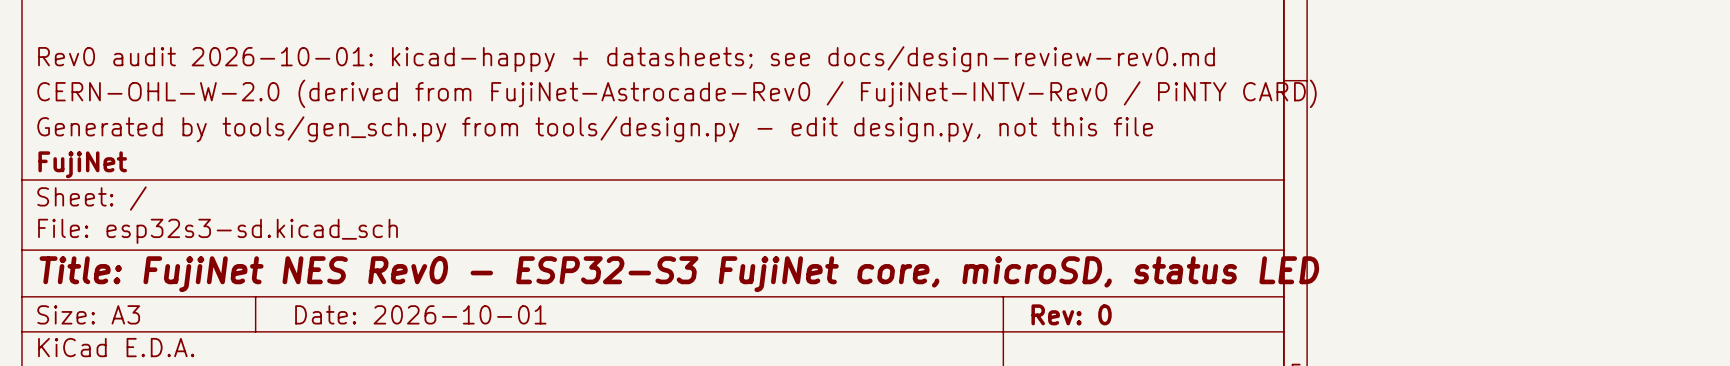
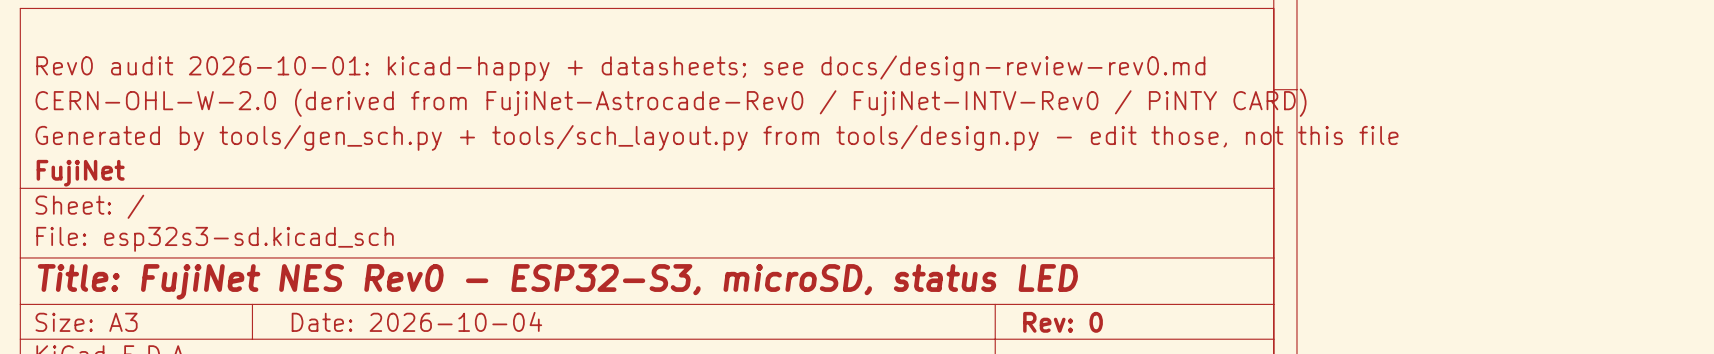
title block: Generated by tools/gen_sch.py from tools/design.py - edit design.py, not this file (595, 129) -> Generated by tools/gen_sch.py + tools/sch_layout.py from tools/design.py - edit those, not this file (717, 137)
title block: Title: FujiNet NES Rev0 - ESP32-S3 FujiNet core, microSD, status LED (679, 274) -> Title: FujiNet NES Rev0 - ESP32-S3, microSD, status LED (557, 281)
title block: Date: 2026-10-01 (420, 314) -> Date: 2026-10-04 (416, 321)

